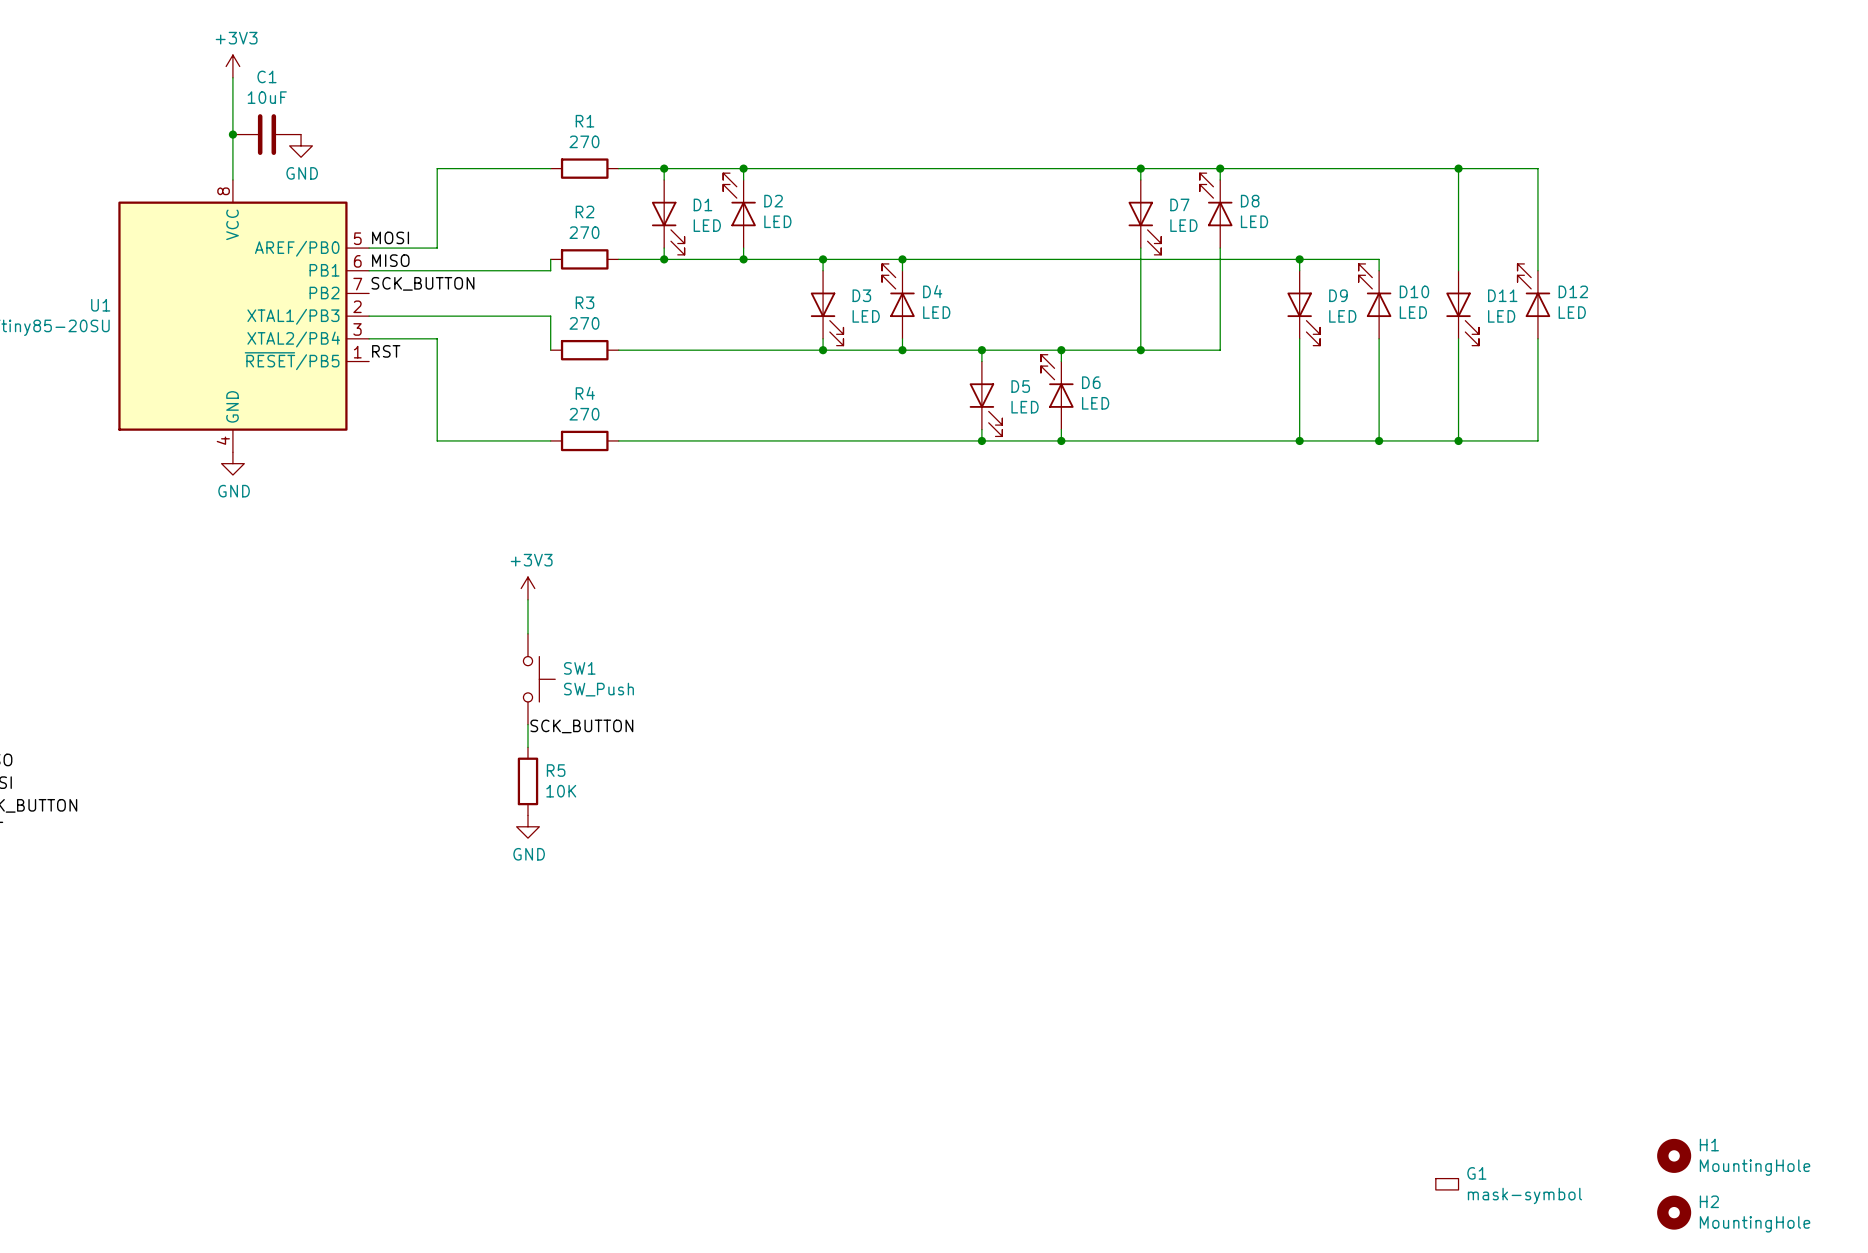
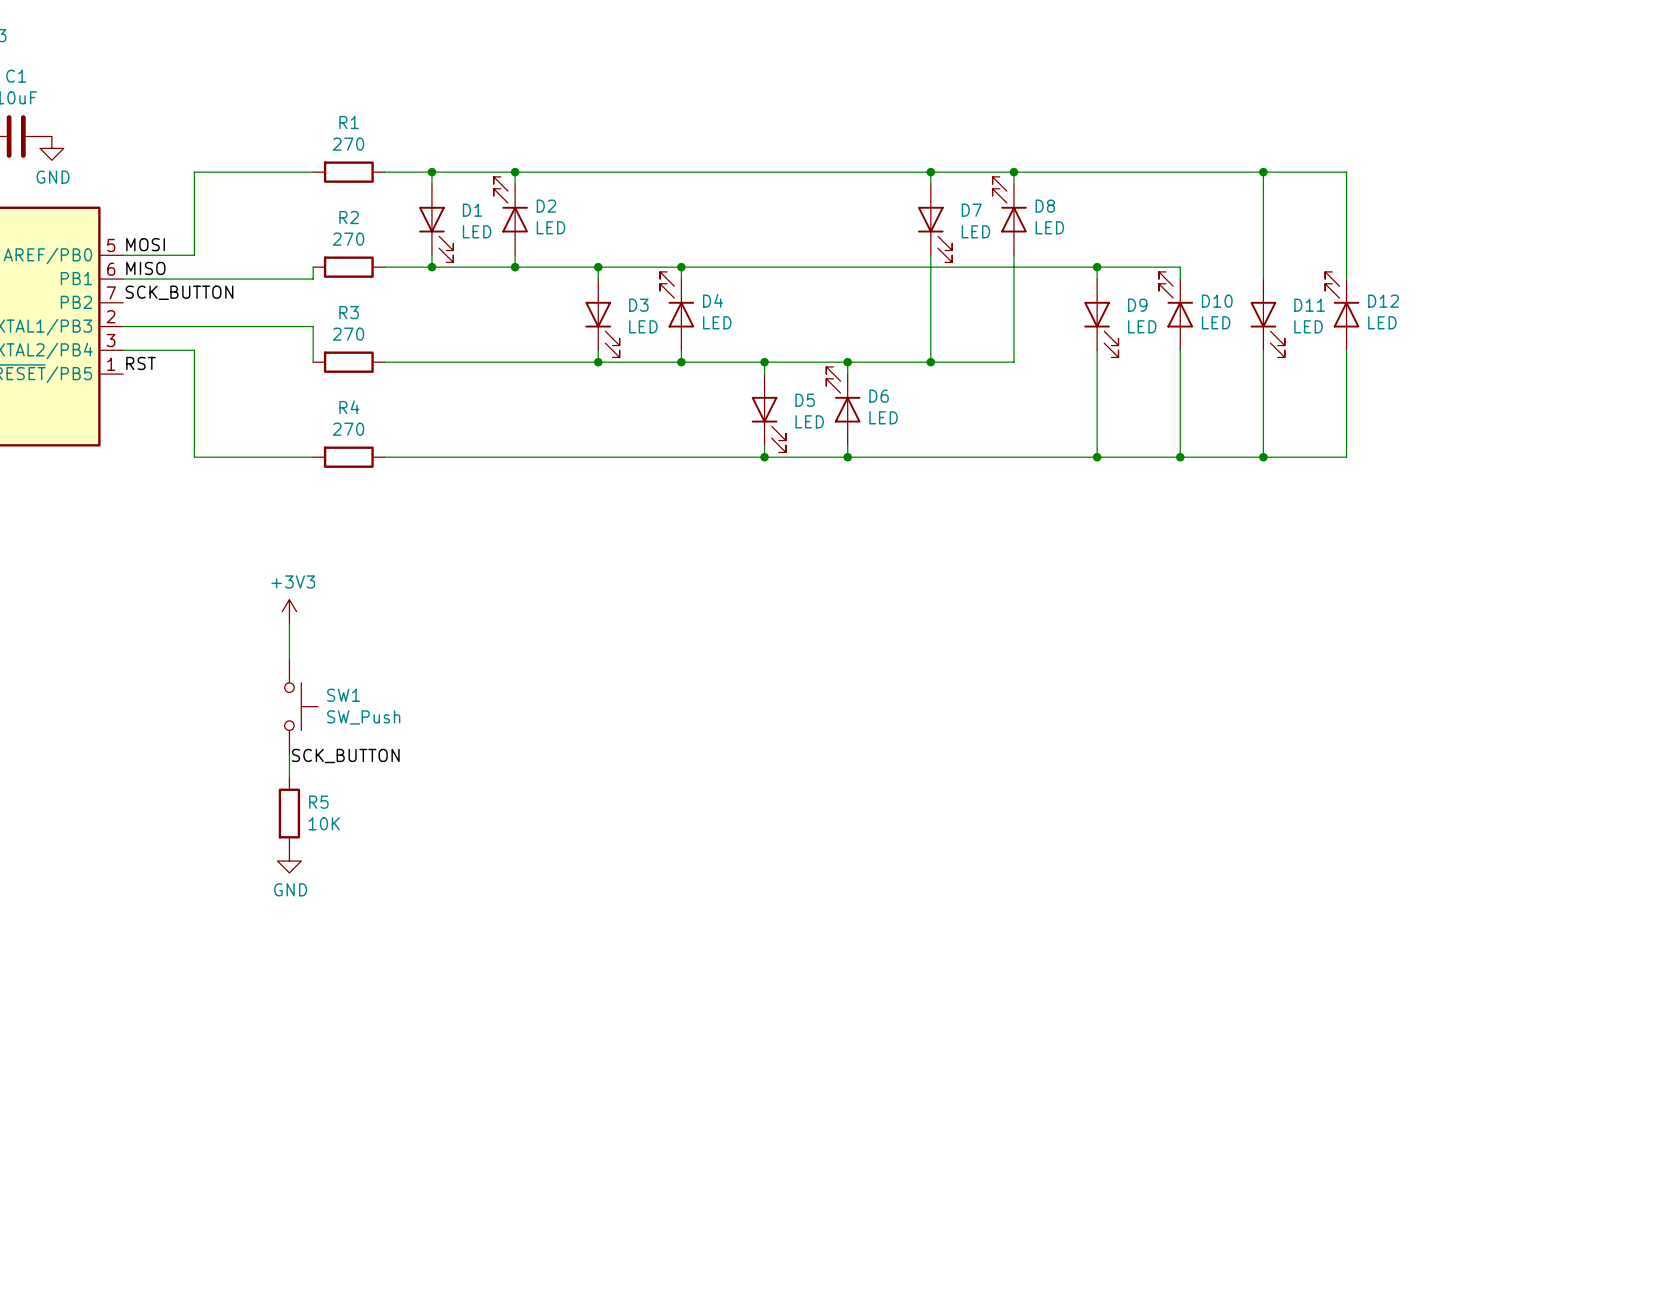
H1: MountingHole (1674, 1155) -> none
G1: mask-symbol (1447, 1184) -> none
H2: MountingHole (1674, 1212) -> none

